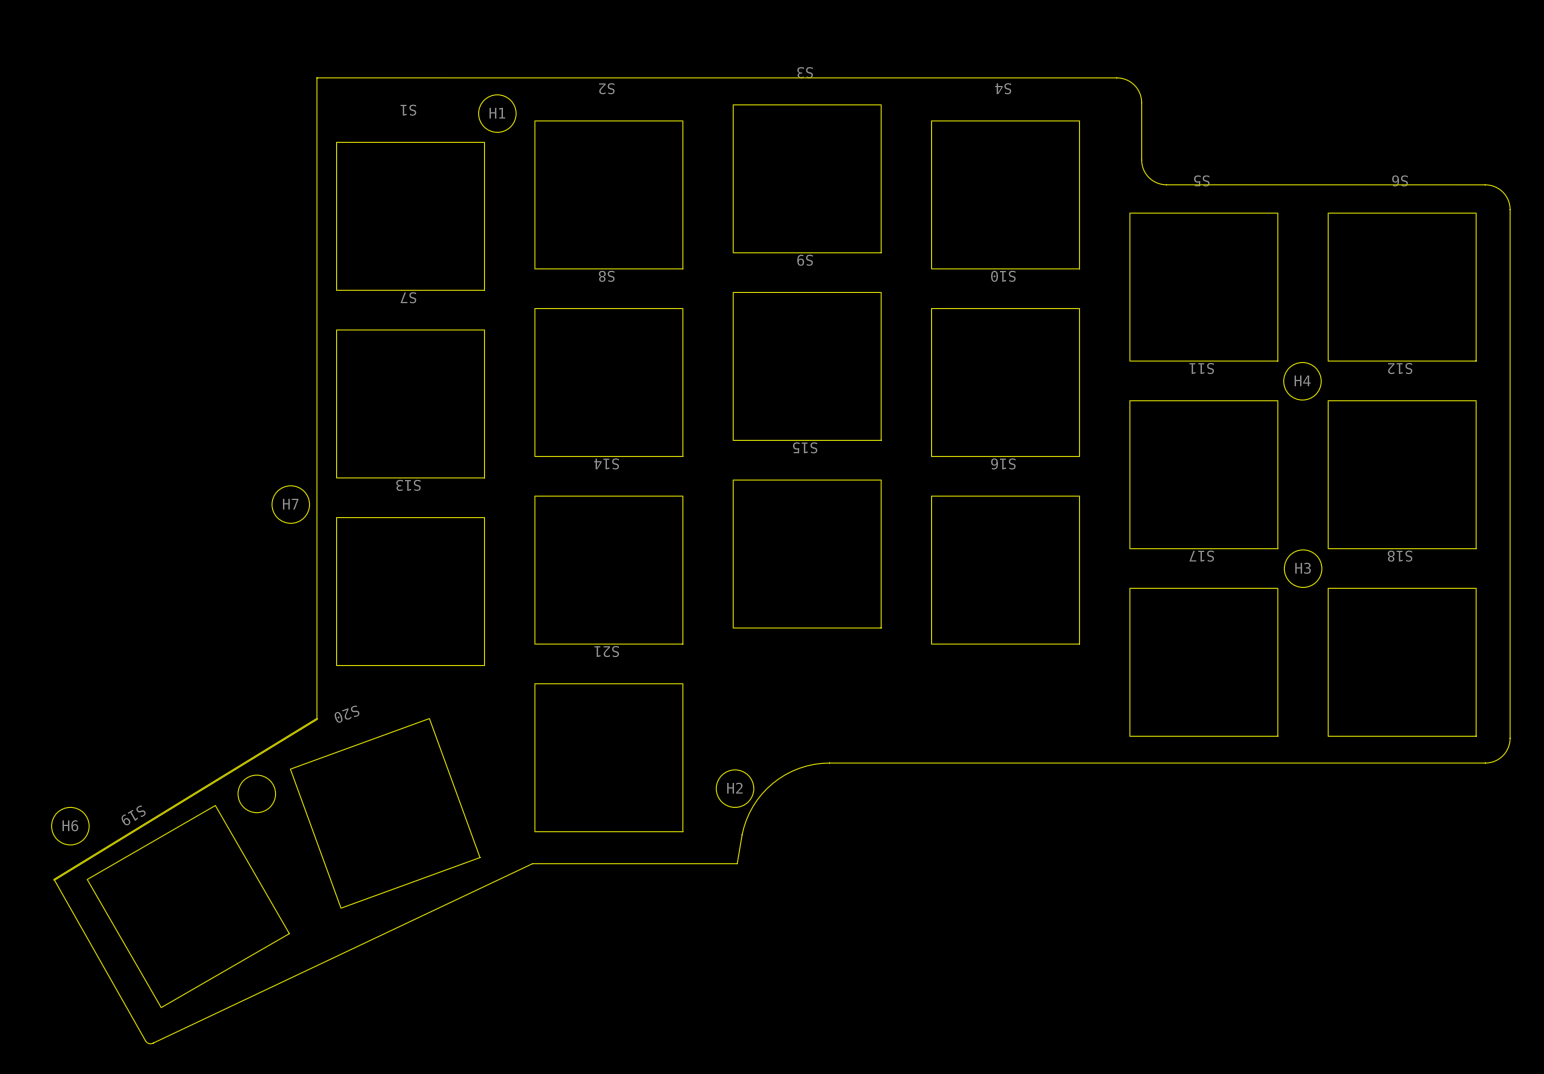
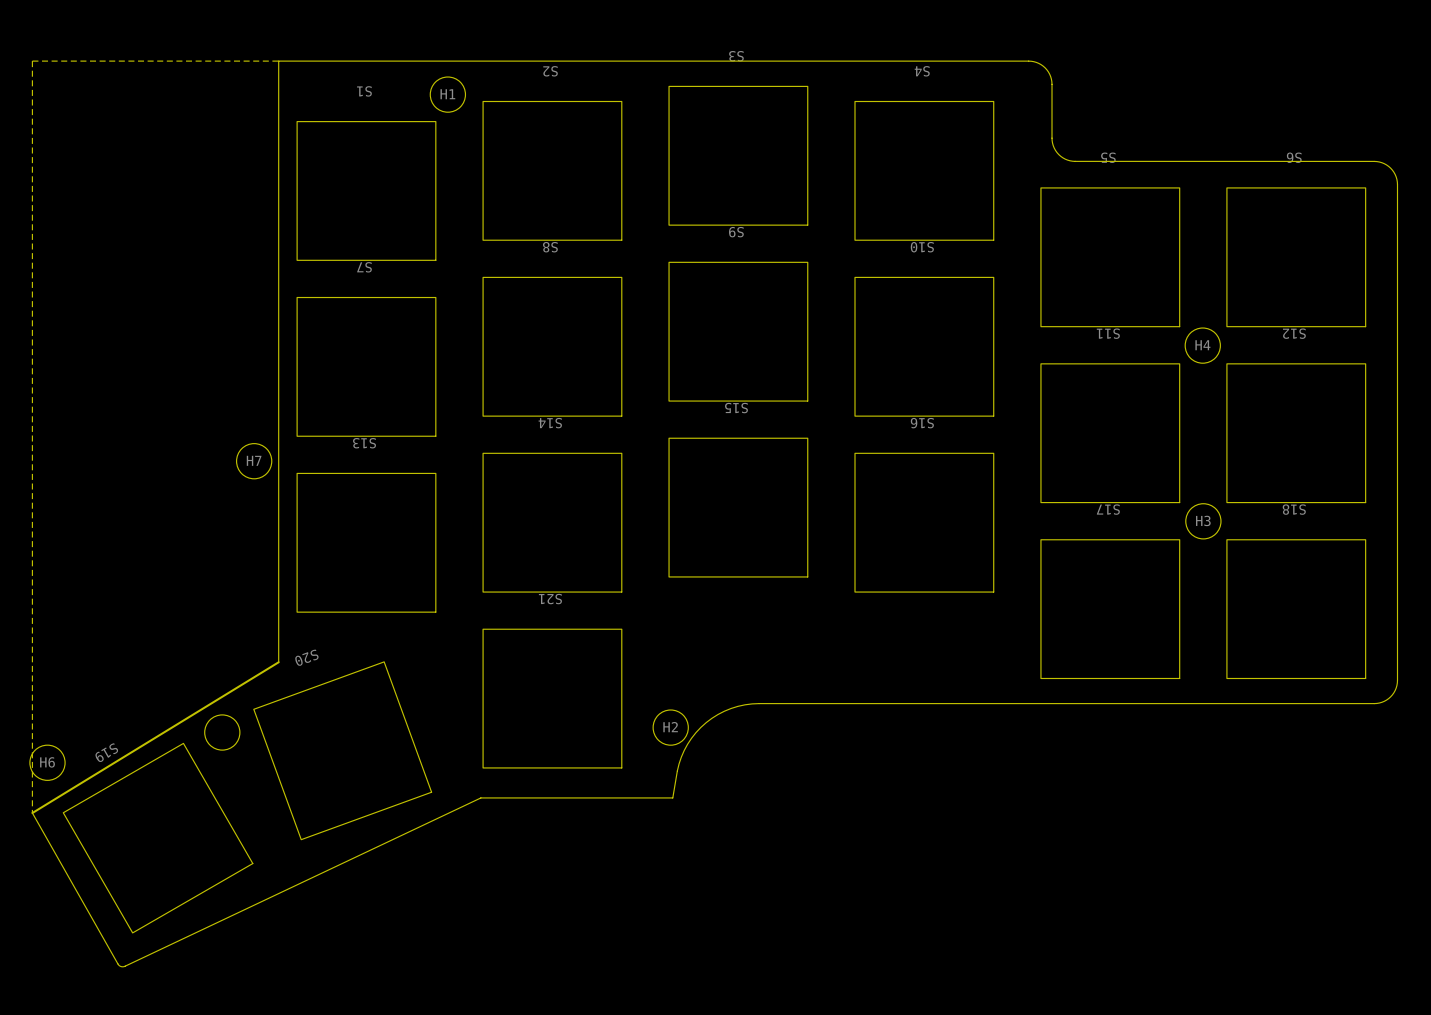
board edge: none -> (278, 61) (32, 61) (32, 813)

